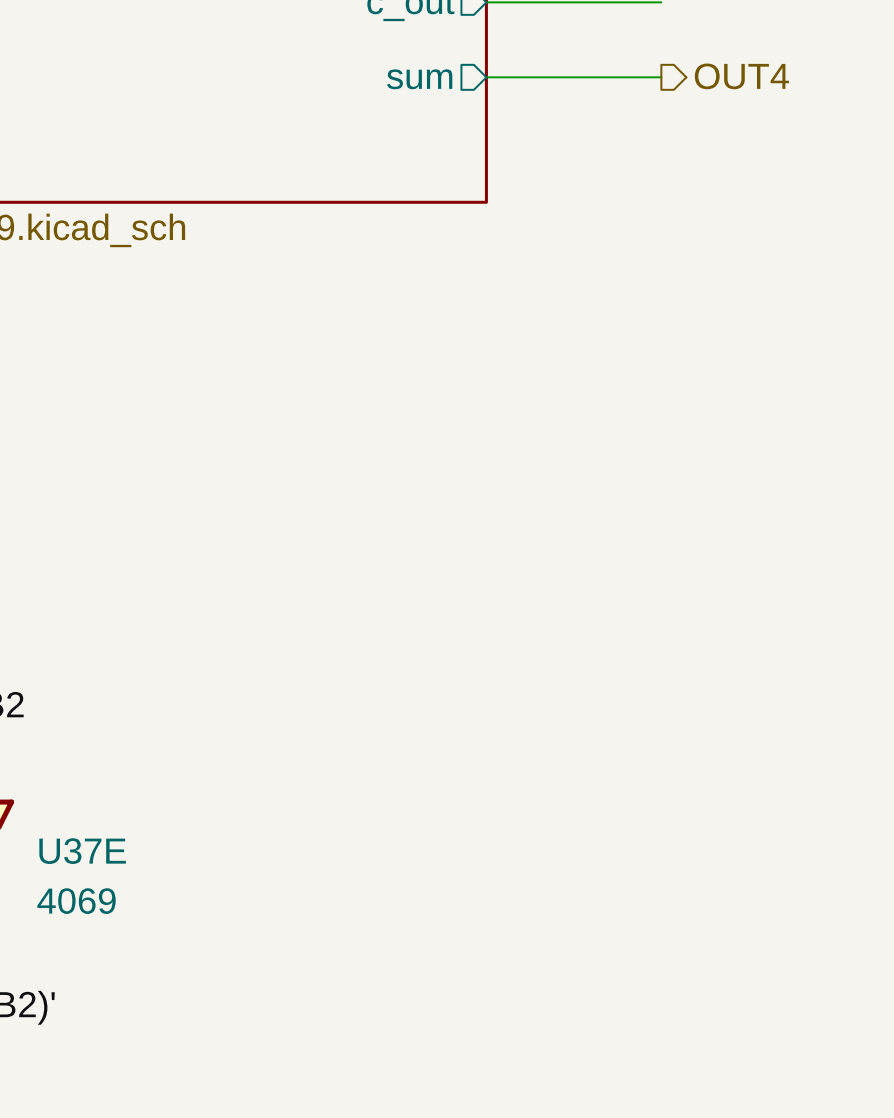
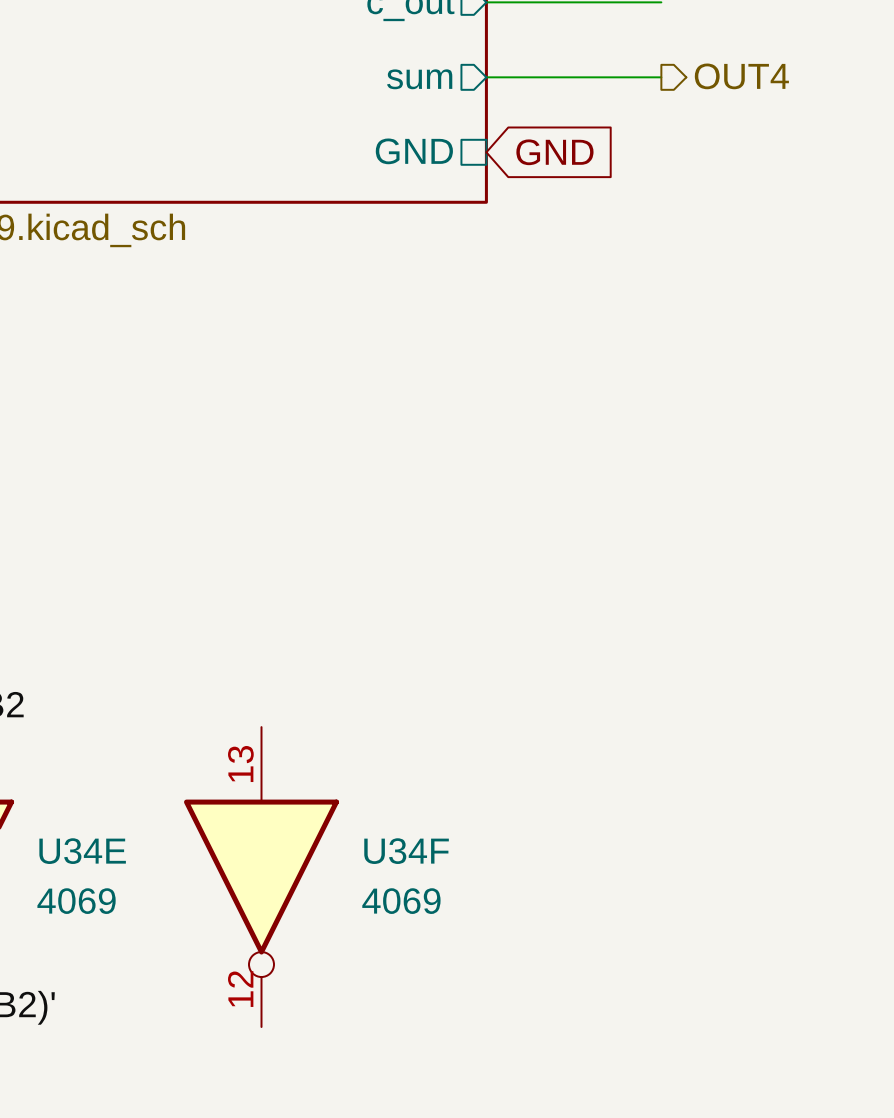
sheet pin: none -> GND (414, 151)
global label: none -> GND (554, 152)
U37E name: U37E (82, 851) -> U34E (82, 851)
U34F: none -> 4069 (261, 877)

